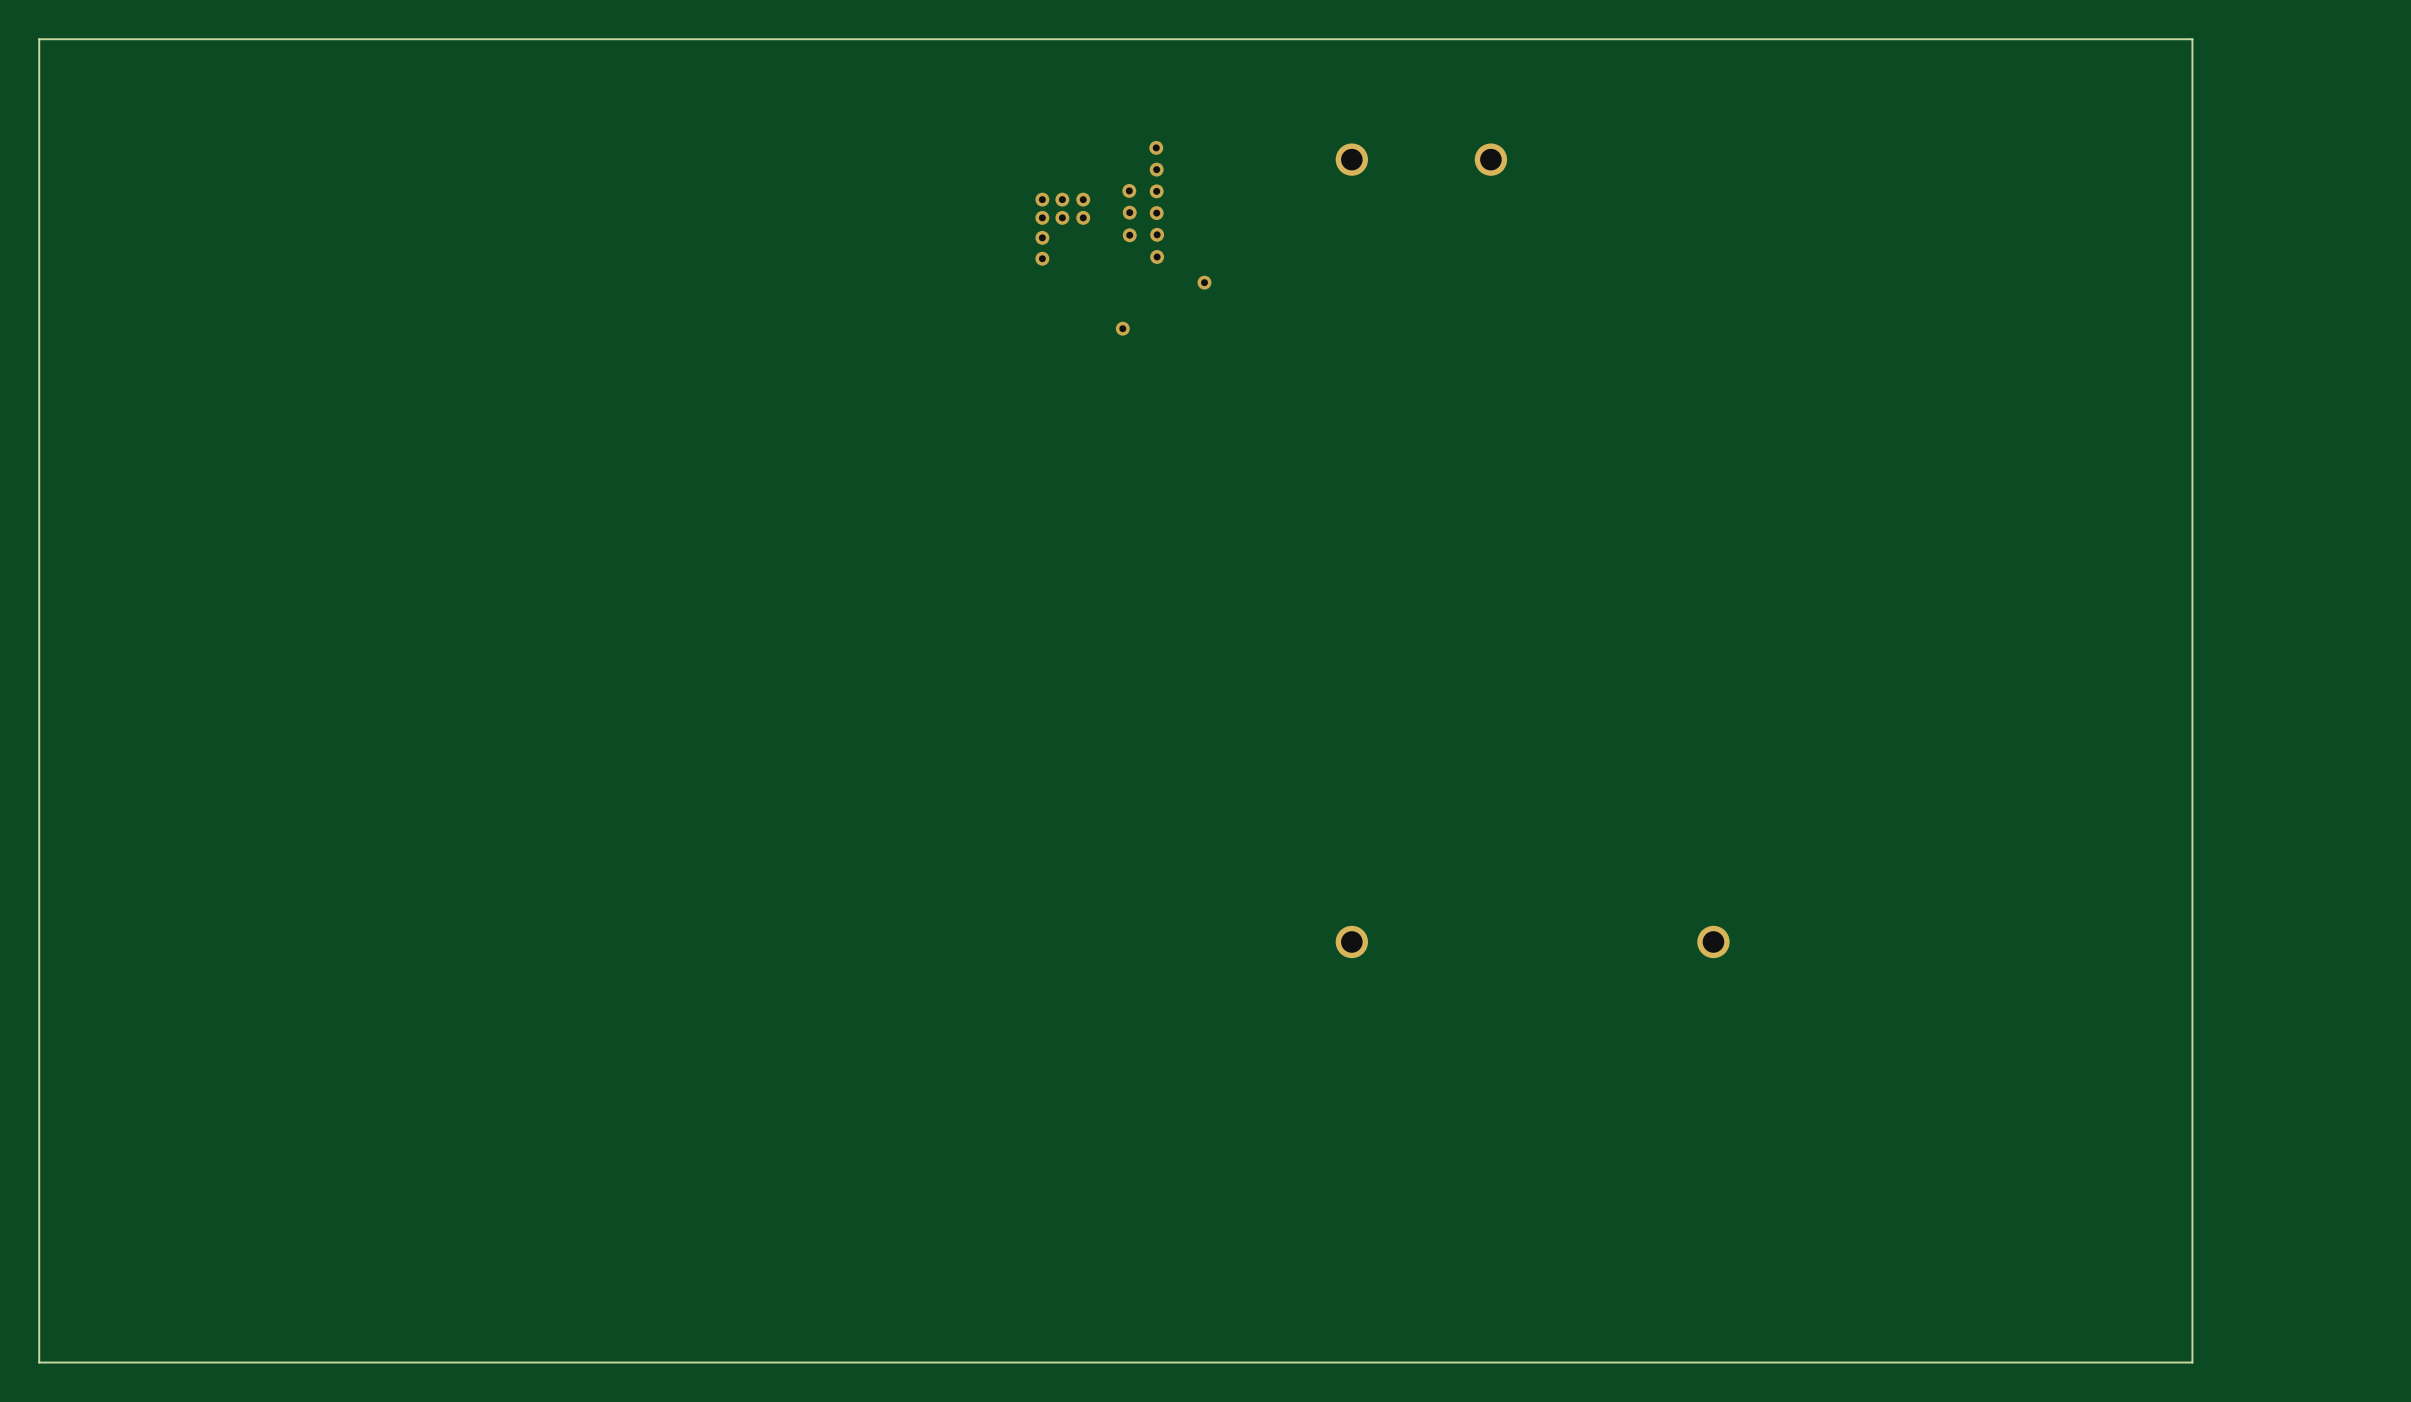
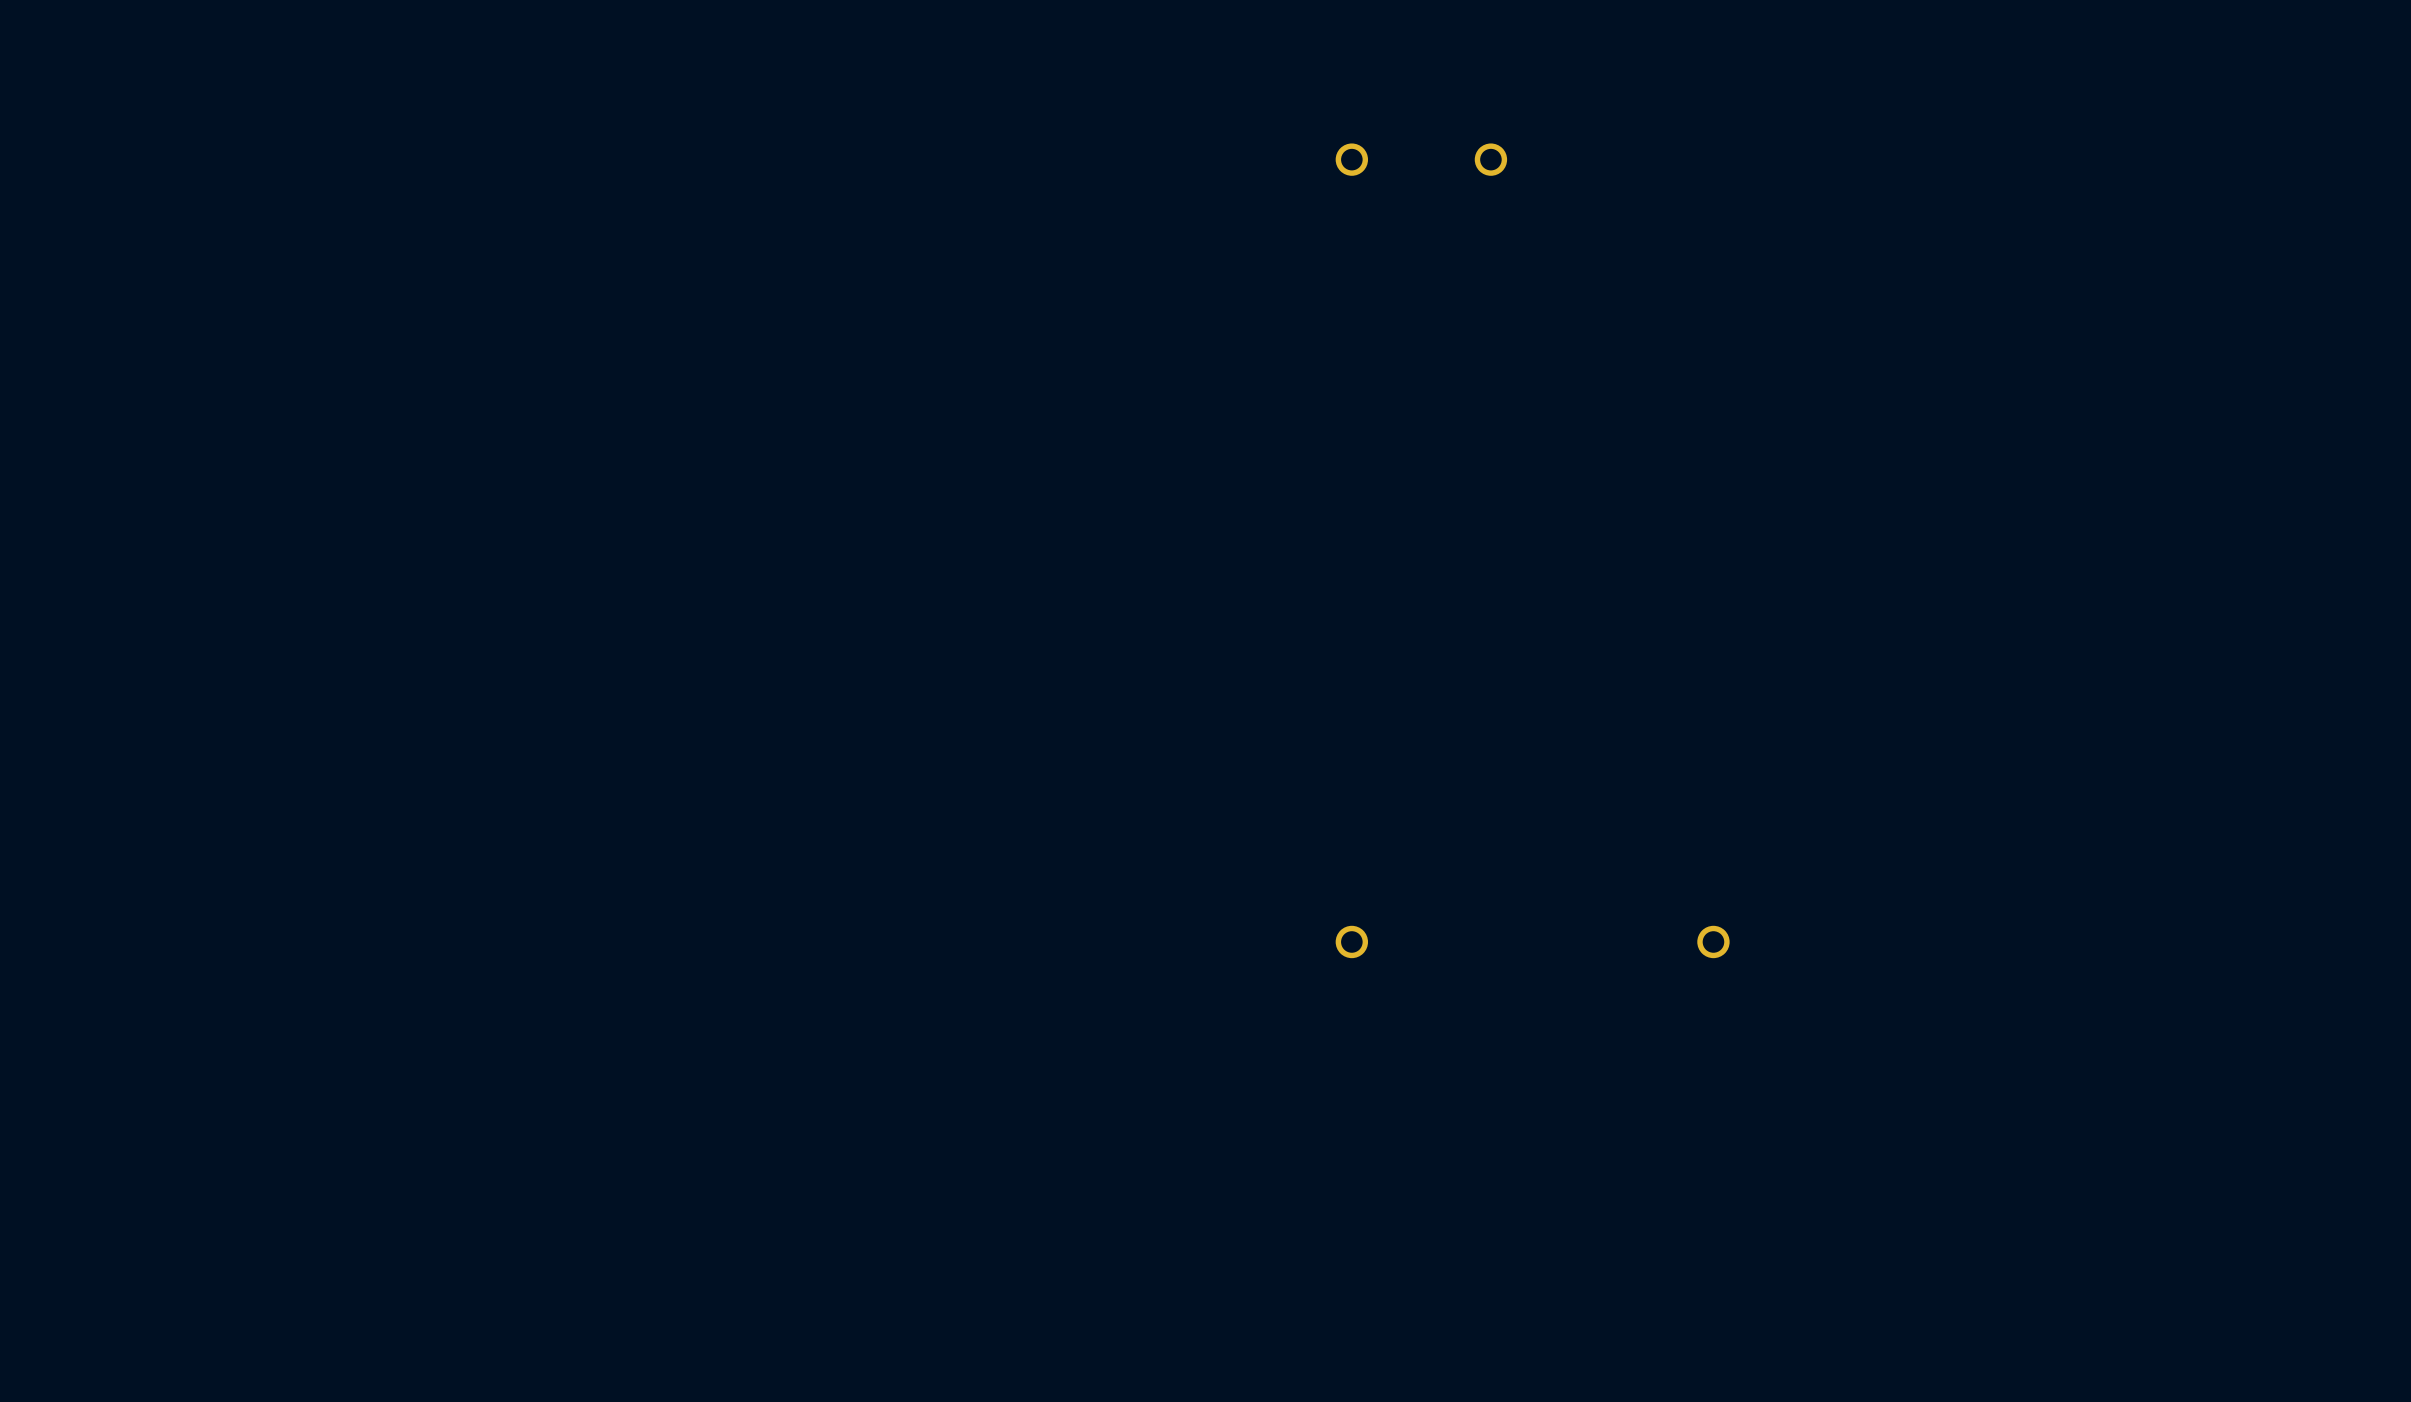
board edge: (2192, 39) (39, 39) (39, 1362) (2192, 1362) (2192, 39) -> none
via: (1156, 147) -> none
via: (1156, 169) -> none
via: (1129, 190) -> none
via: (1156, 191) -> none
via: (1042, 199) -> none
via: (1062, 199) -> none
via: (1083, 199) -> none
via: (1129, 212) -> none
via: (1156, 213) -> none
via: (1042, 217) -> none
via: (1062, 217) -> none
via: (1083, 217) -> none
via: (1157, 234) -> none
via: (1129, 235) -> none
via: (1042, 237) -> none
via: (1157, 256) -> none
via: (1042, 258) -> none
via: (1204, 282) -> none
via: (1122, 328) -> none

